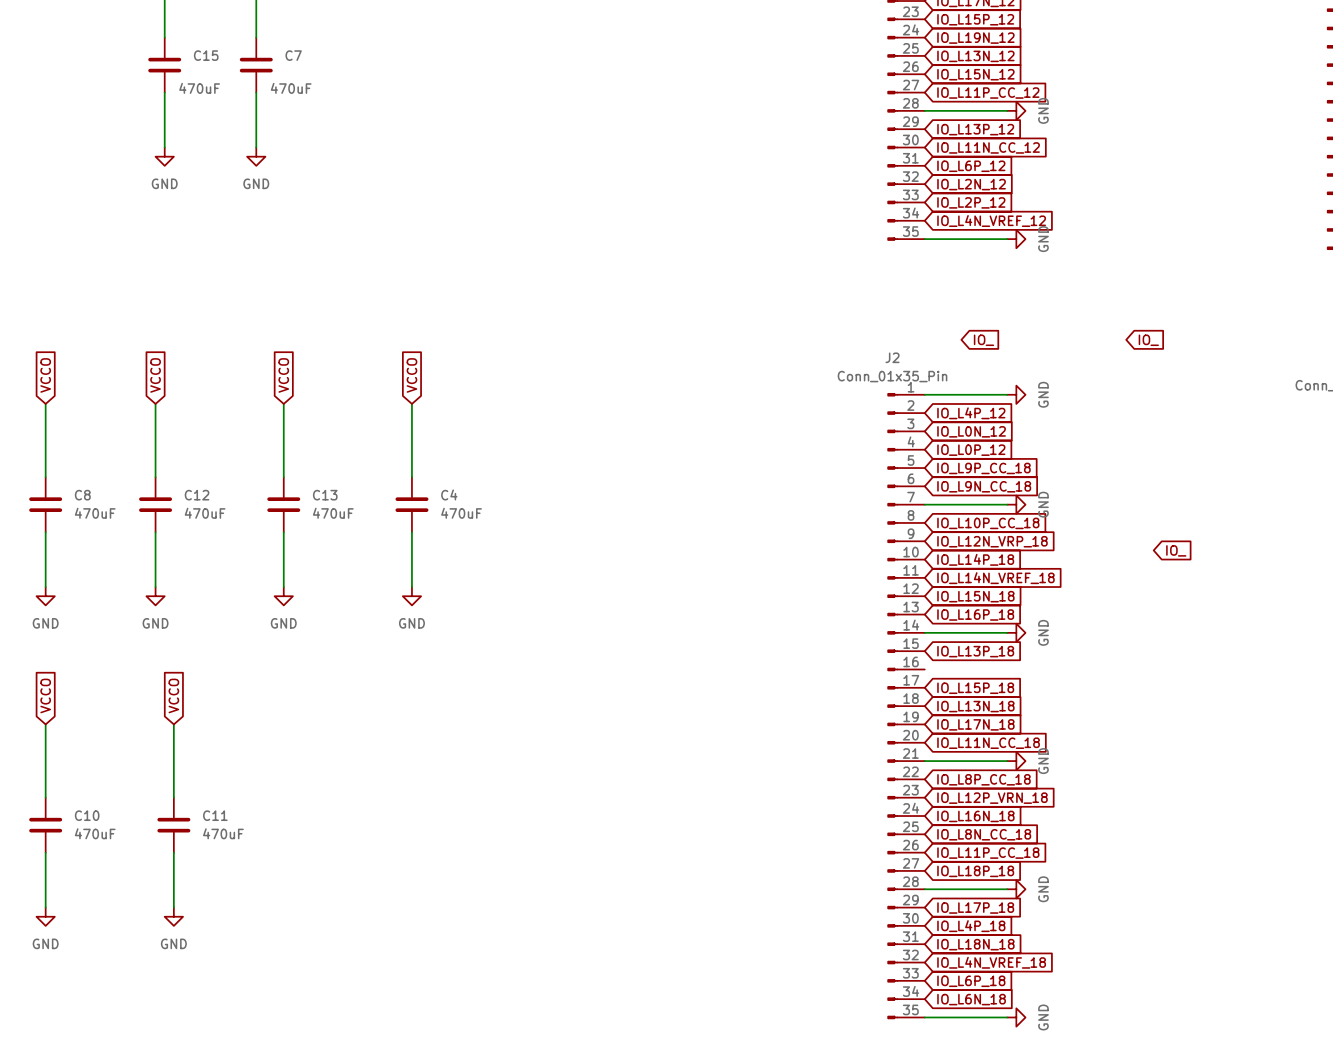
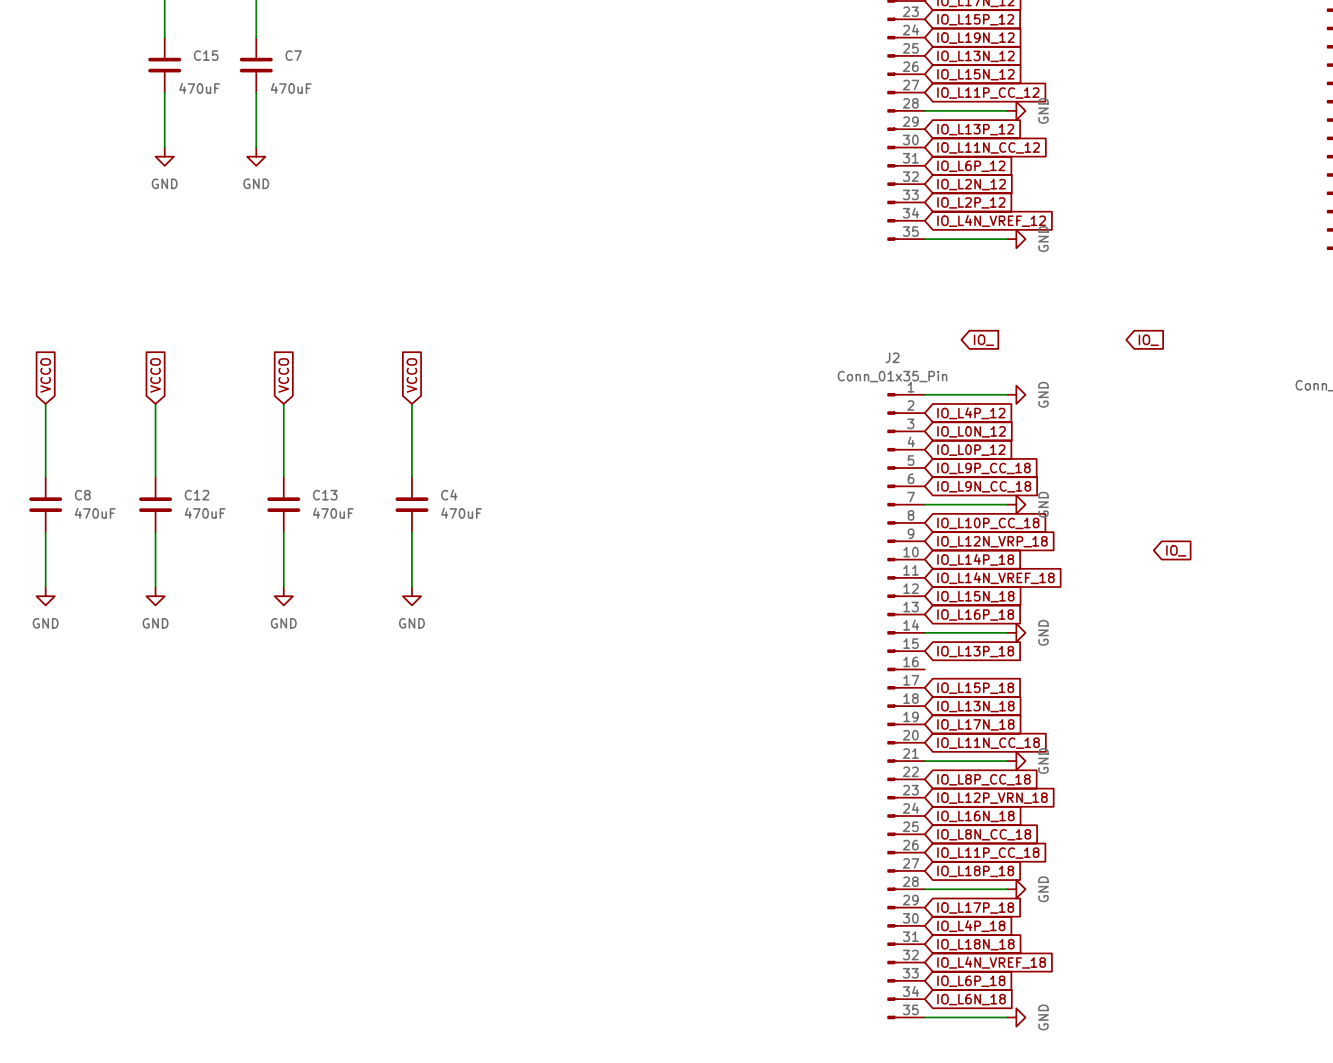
global label: VCCO (45, 695) -> none
global label: VCCO (173, 695) -> none
wire: (45, 724) (45, 797) -> none
wire: (173, 724) (173, 797) -> none
C10: 470uF (45, 825) -> none
C11: 470uF (173, 825) -> none
wire: (45, 852) (45, 907) -> none
wire: (173, 852) (173, 907) -> none
power symbol: GND (45, 916) -> none
power symbol: GND (173, 916) -> none

